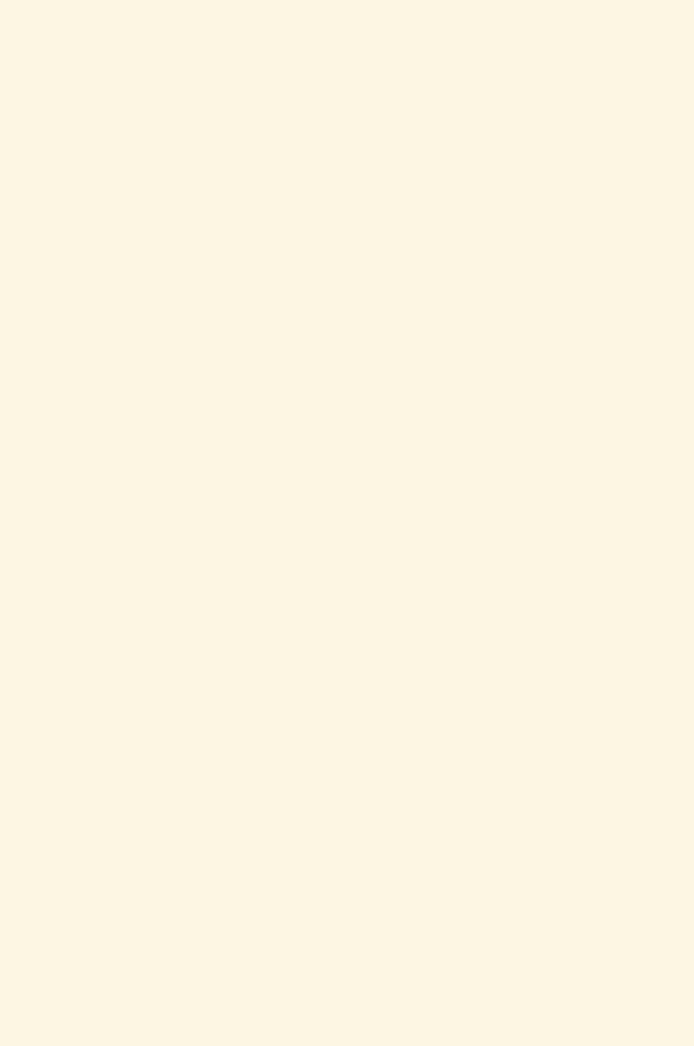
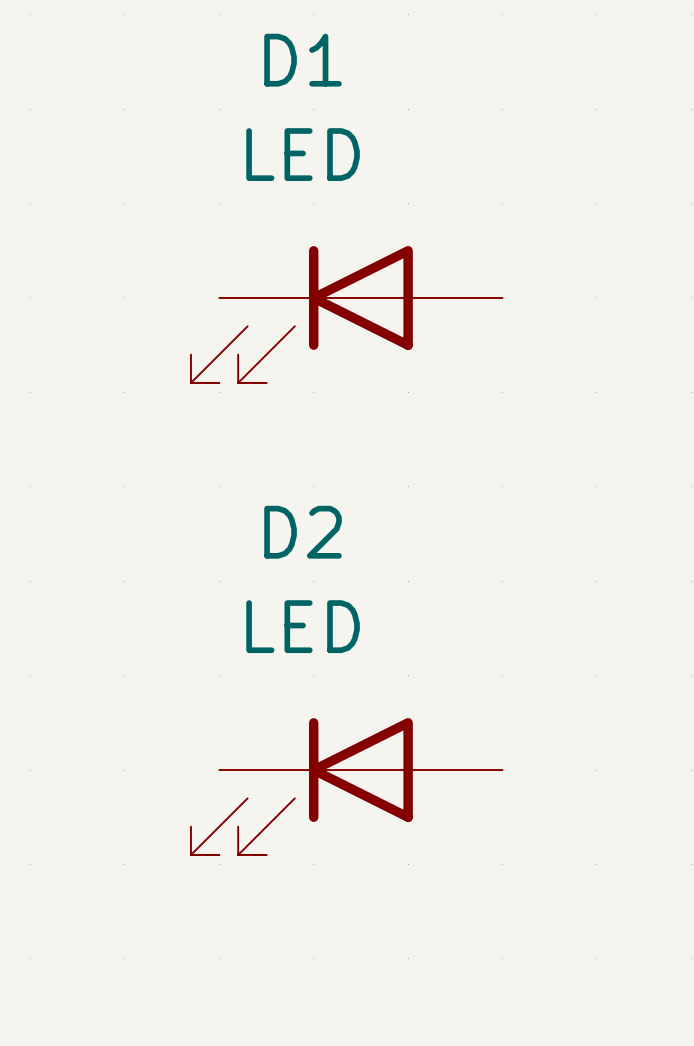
D1: none -> LED (346, 314)
D2: none -> LED (346, 786)

